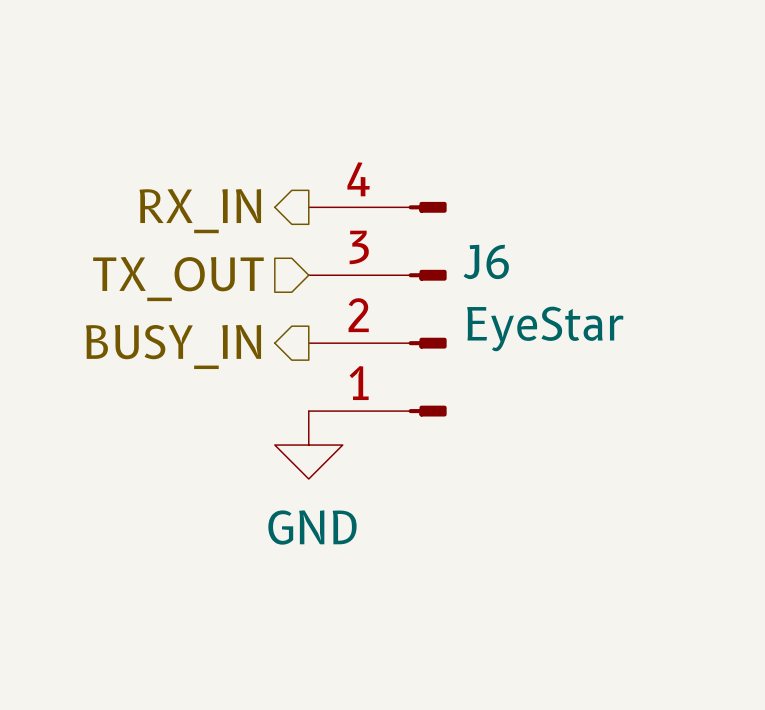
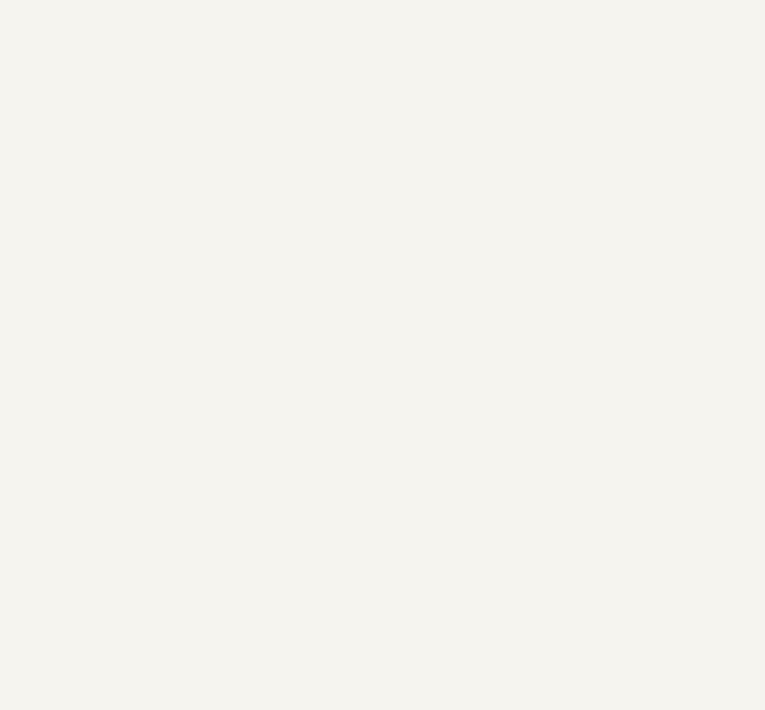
hierarchical label: RX_IN (200, 211) -> none
hierarchical label: TX_OUT (178, 279) -> none
J6: EyeStar (377, 309) -> none
hierarchical label: BUSY_IN (173, 346) -> none
power symbol: GND (308, 445) -> none

